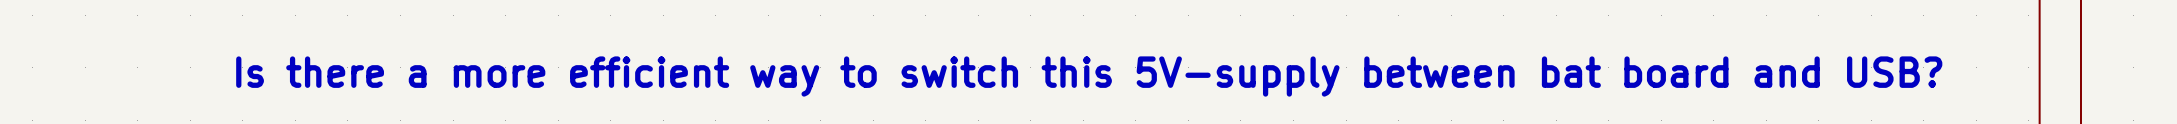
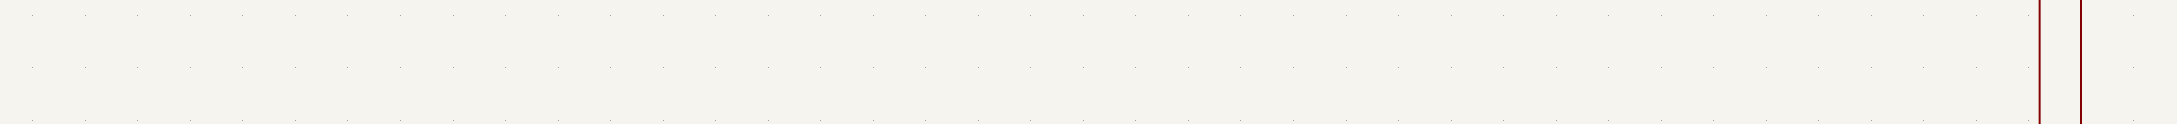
text: Is there a more efficient way to switch this 5V-supply between bat board and USB? (1089, 76) -> none

